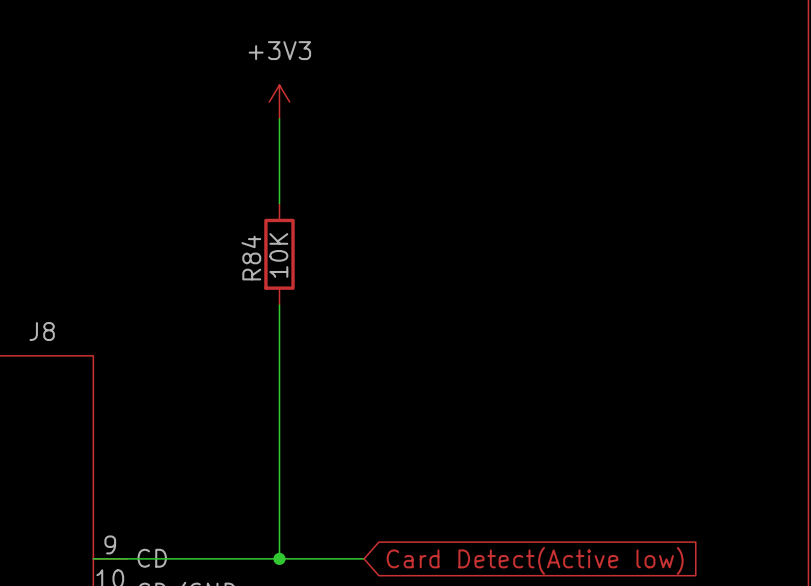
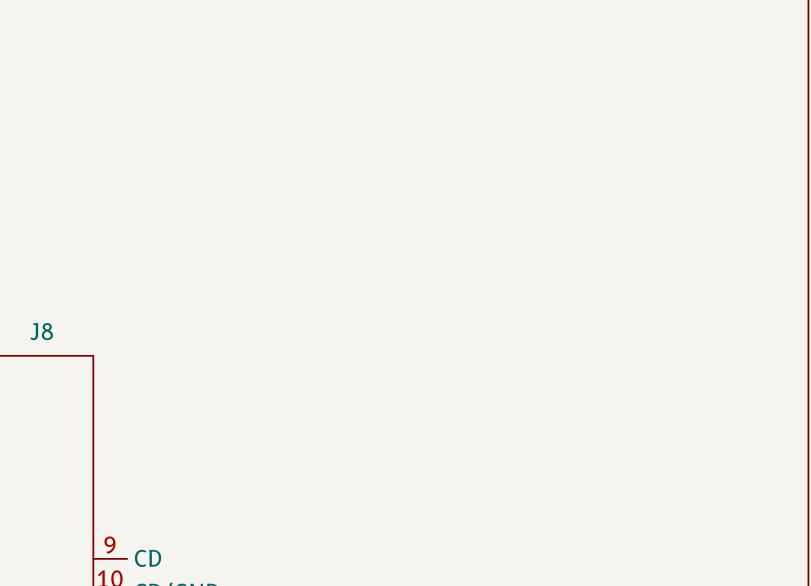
power symbol: +3V3 (279, 102) -> none
wire: (279, 118) (279, 203) -> none
R84: 10K (279, 254) -> none
wire: (279, 305) (279, 558) -> none
wire: (93, 558) (364, 558) -> none
junction: (279, 558) -> none
global label: Card Detect(Active low) (535, 560) -> none

